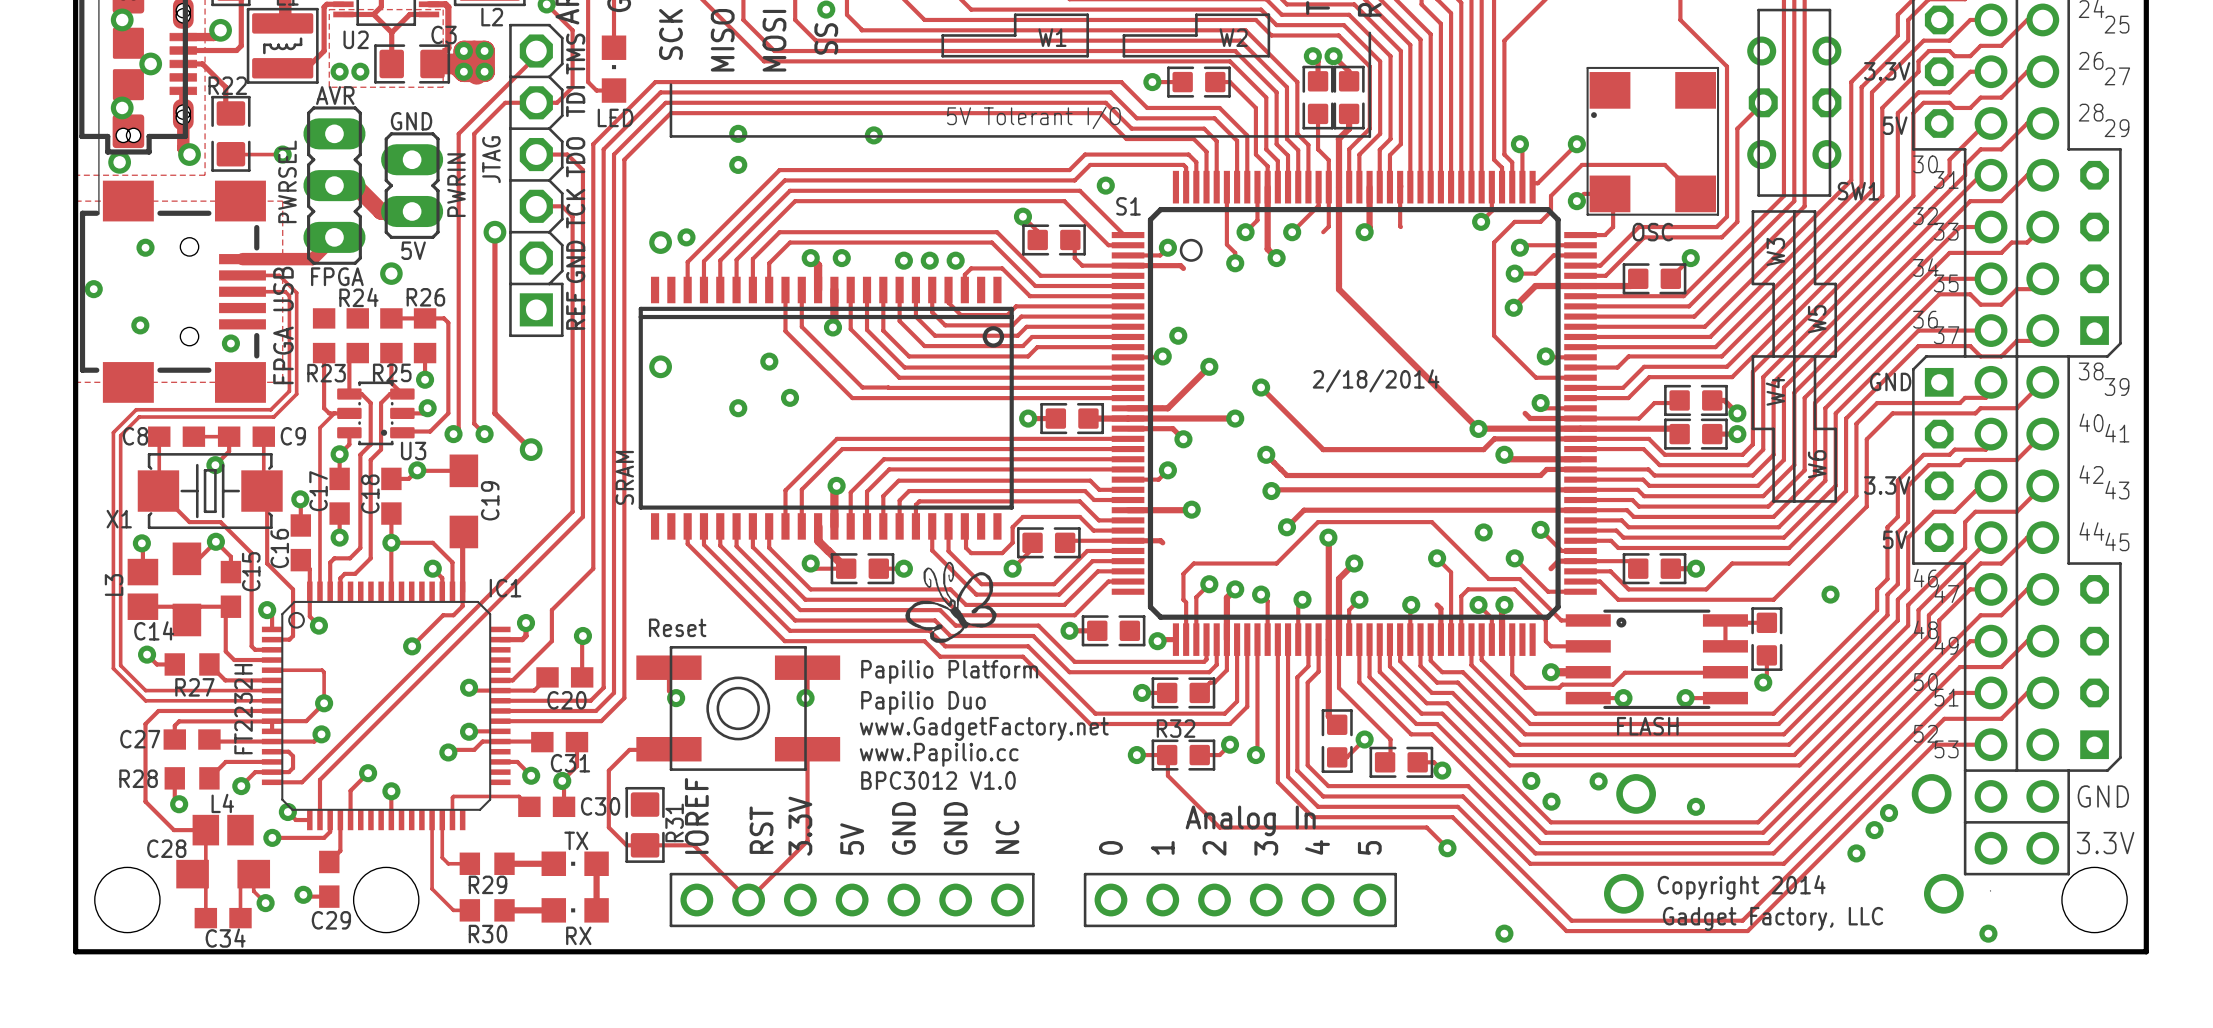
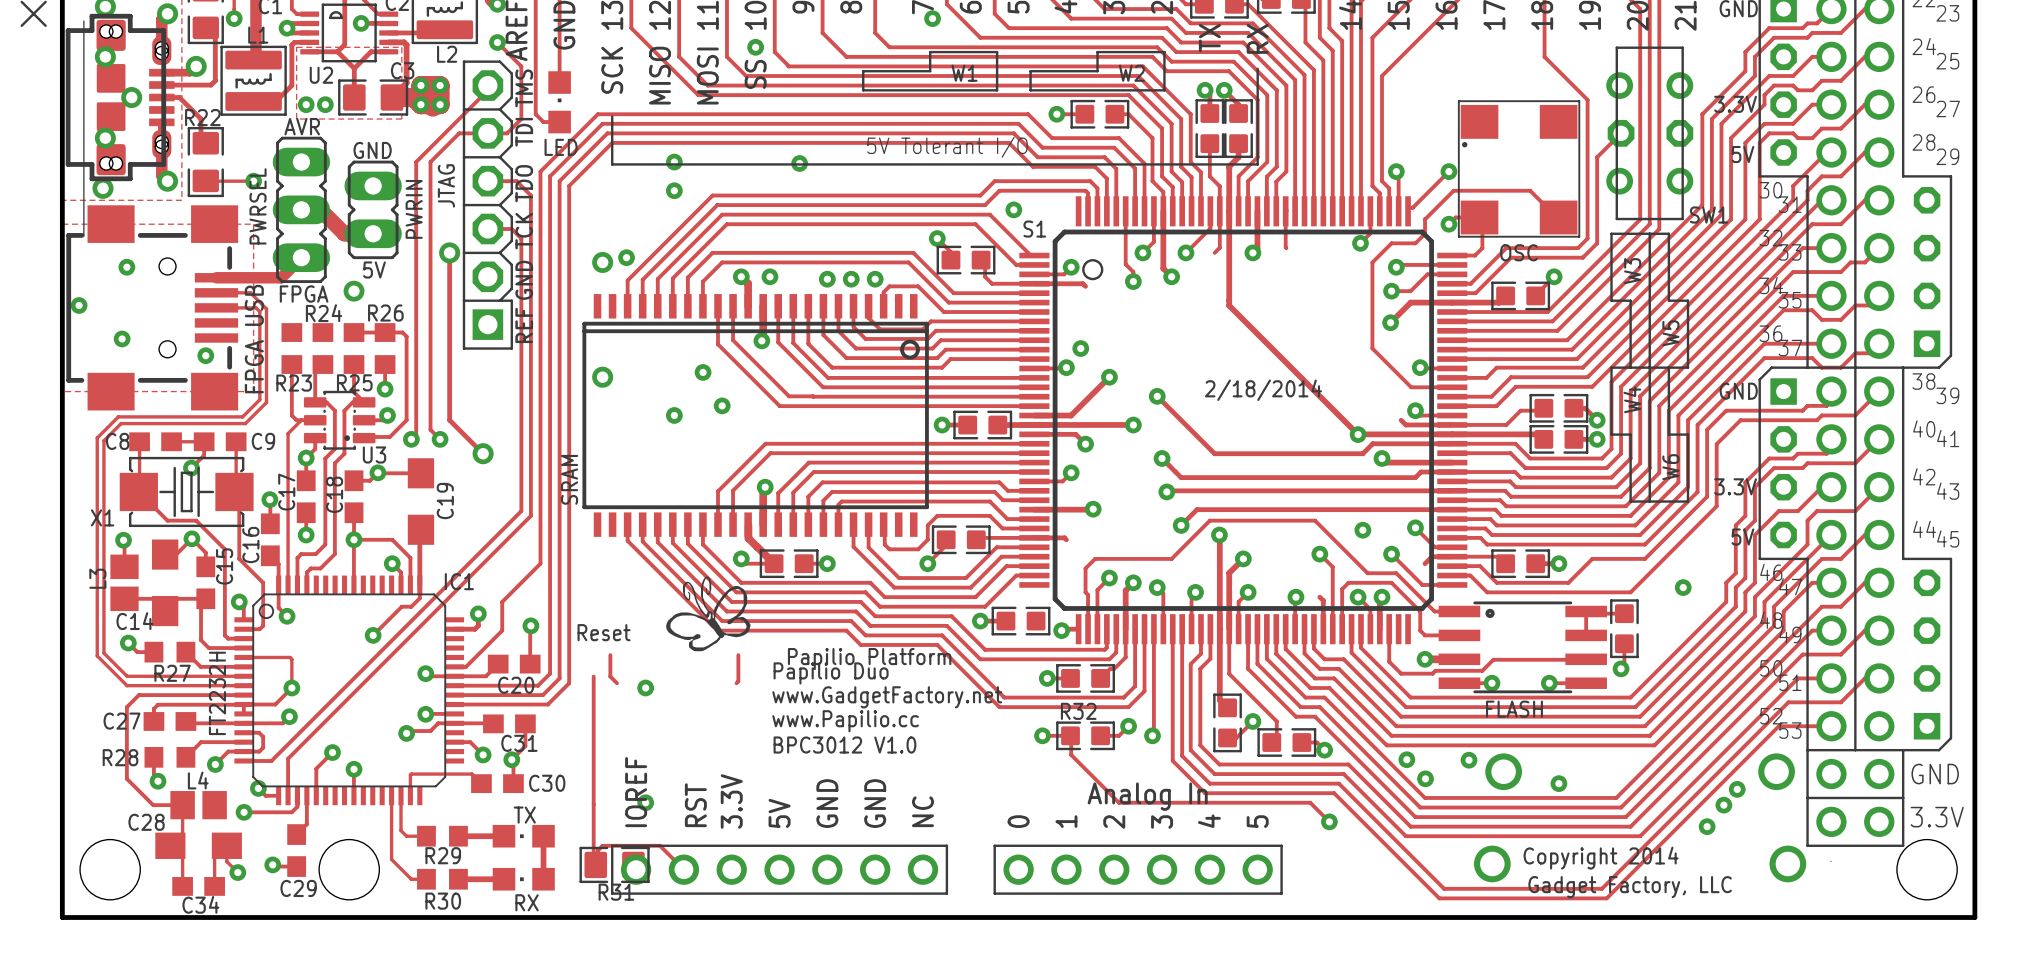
drawing position: (950, 602) -> (708, 613)
text position: Reset (677, 627) -> Reset (604, 632)
via position: (676, 698) -> (645, 688)
via: (805, 698) -> none
text position: Papilio Duo (923, 703) -> Papilio Duo (831, 673)
part: (738, 708) -> none
text position: www.GadgetFactory.net (984, 728) -> www.GadgetFactory.net (887, 697)
track: (668, 749) (629, 749) (608, 770) (608, 827) (626, 845) (693, 845) (722, 874) -> (593, 676) (593, 862) (595, 864) (597, 862) (597, 850) (602, 845) (660, 845)
track: (807, 749) (807, 841) (748, 900) -> none
text position: www.Papilio.cc (939, 754) -> www.Papilio.cc (845, 721)
text position: BPC3012 V1.0 (938, 780) -> BPC3012 V1.0 (844, 745)
R31 rotation: 0° (645, 824) -> 90° clockwise (614, 864)
R31 position: (645, 824) -> (614, 864)
via: none -> (645, 802)
via: (1504, 933) -> none
via: (1988, 933) -> none

